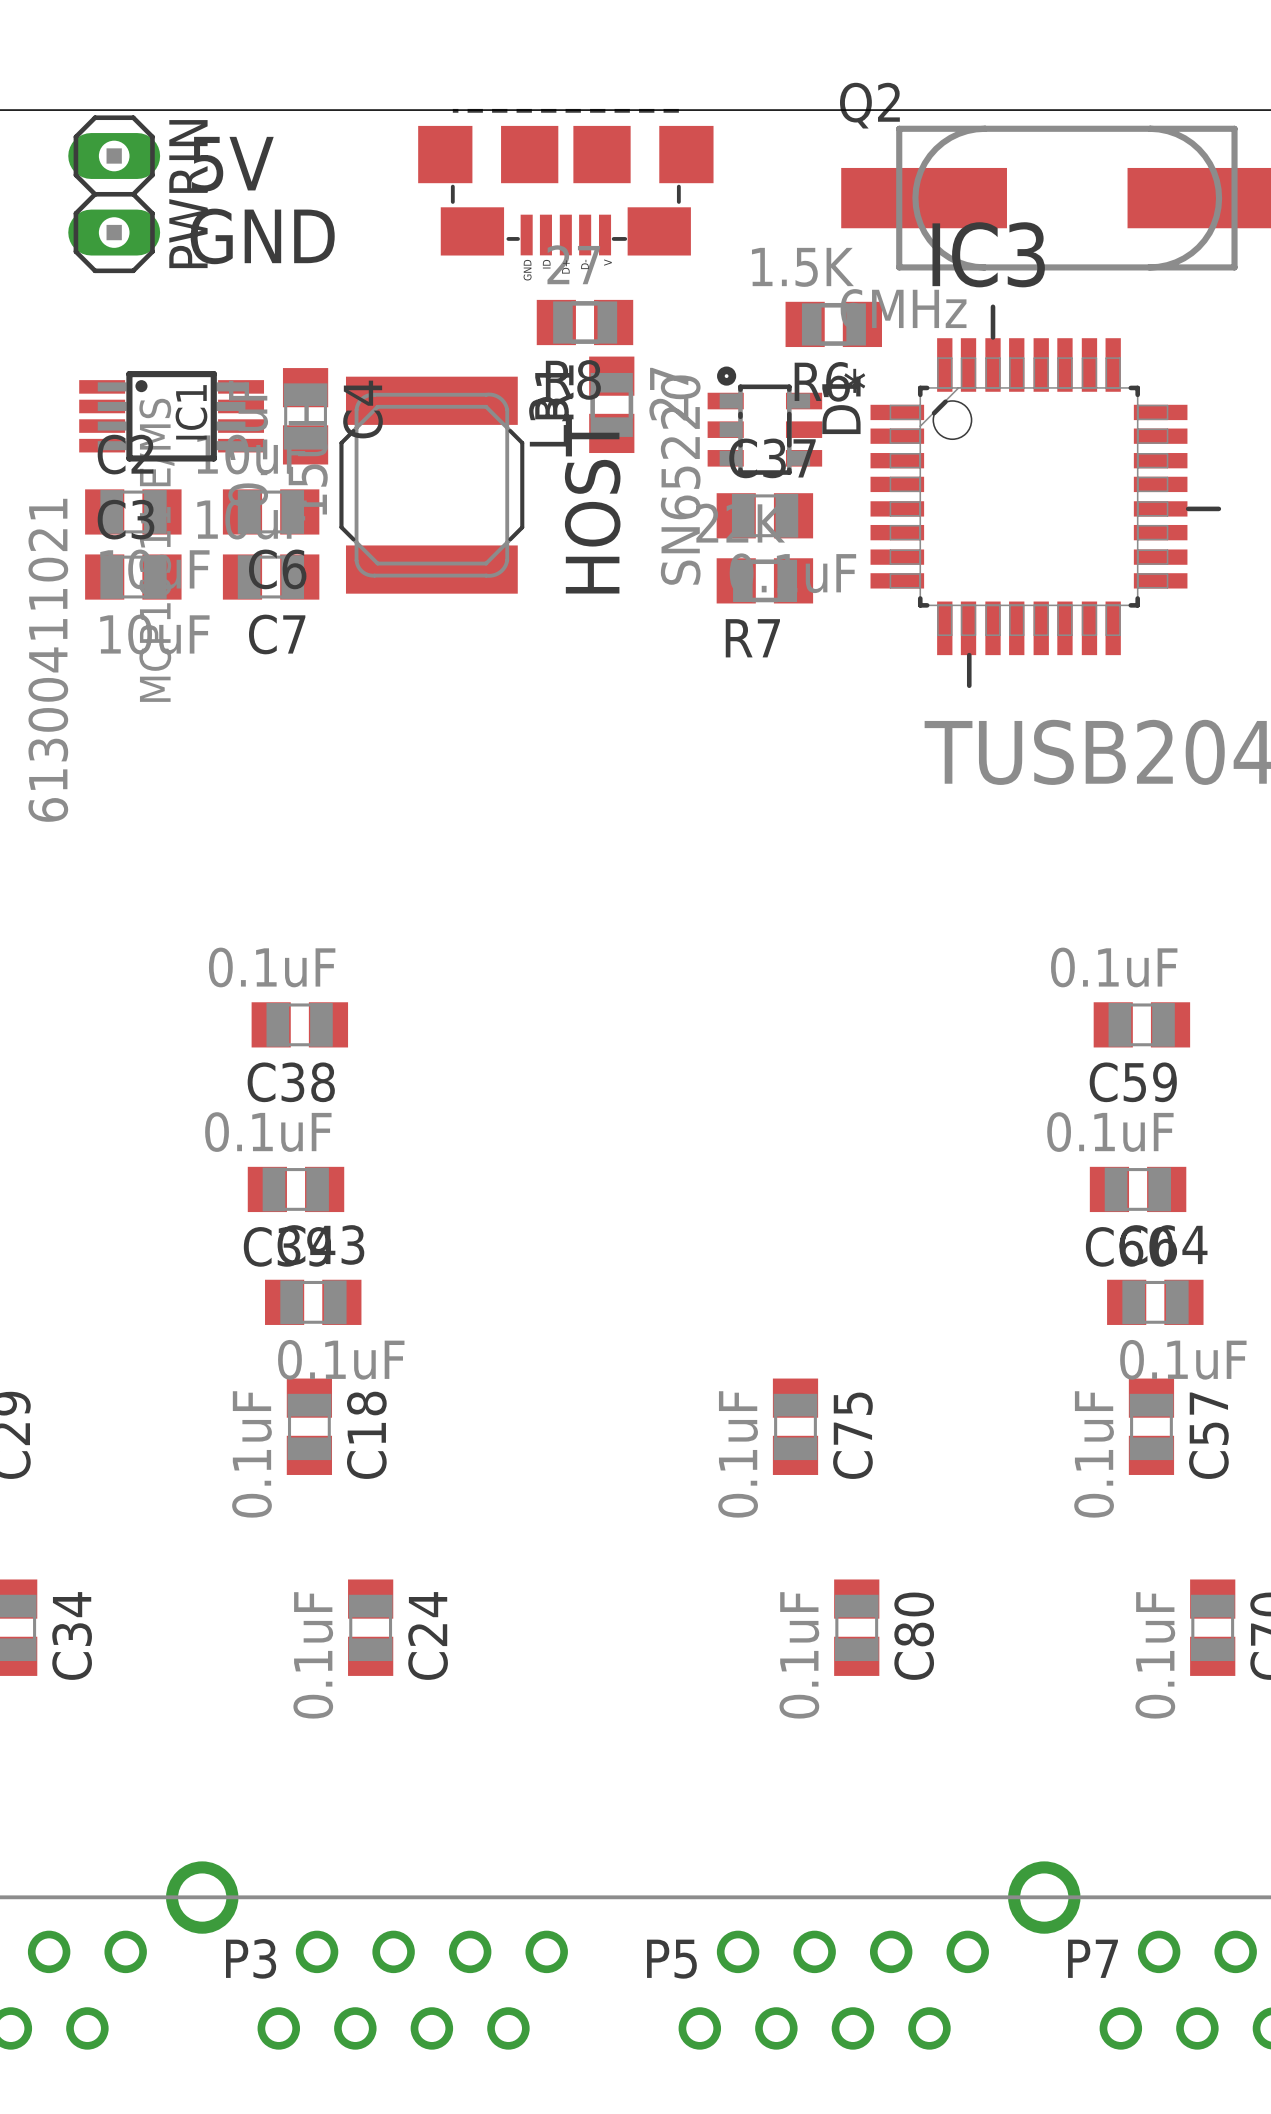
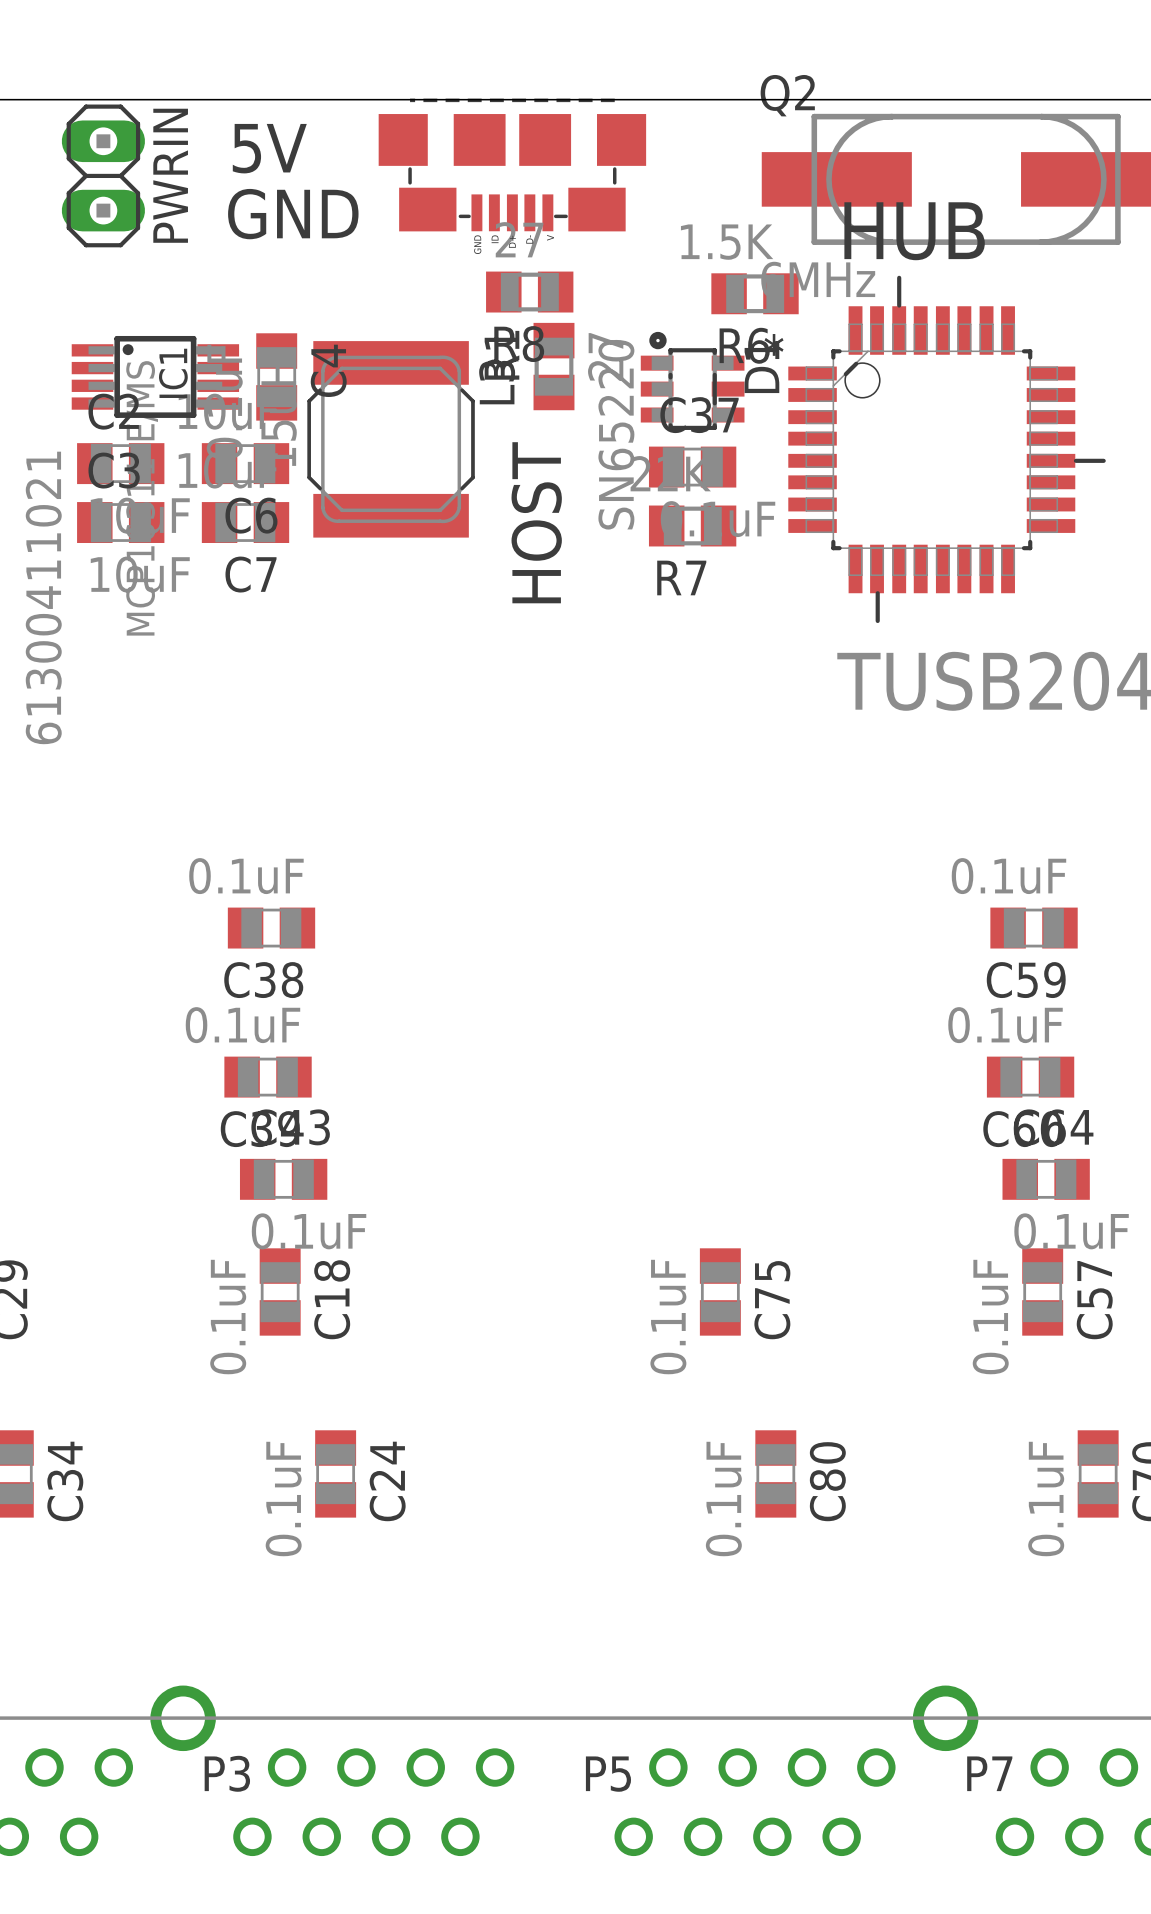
text position: 5V (232, 164) -> 5V (269, 148)
text position: GND (262, 236) -> GND (293, 214)
IC3 name: IC3 (988, 254) -> HUB (914, 231)
text position: HOST (592, 504) -> HOST (536, 522)

